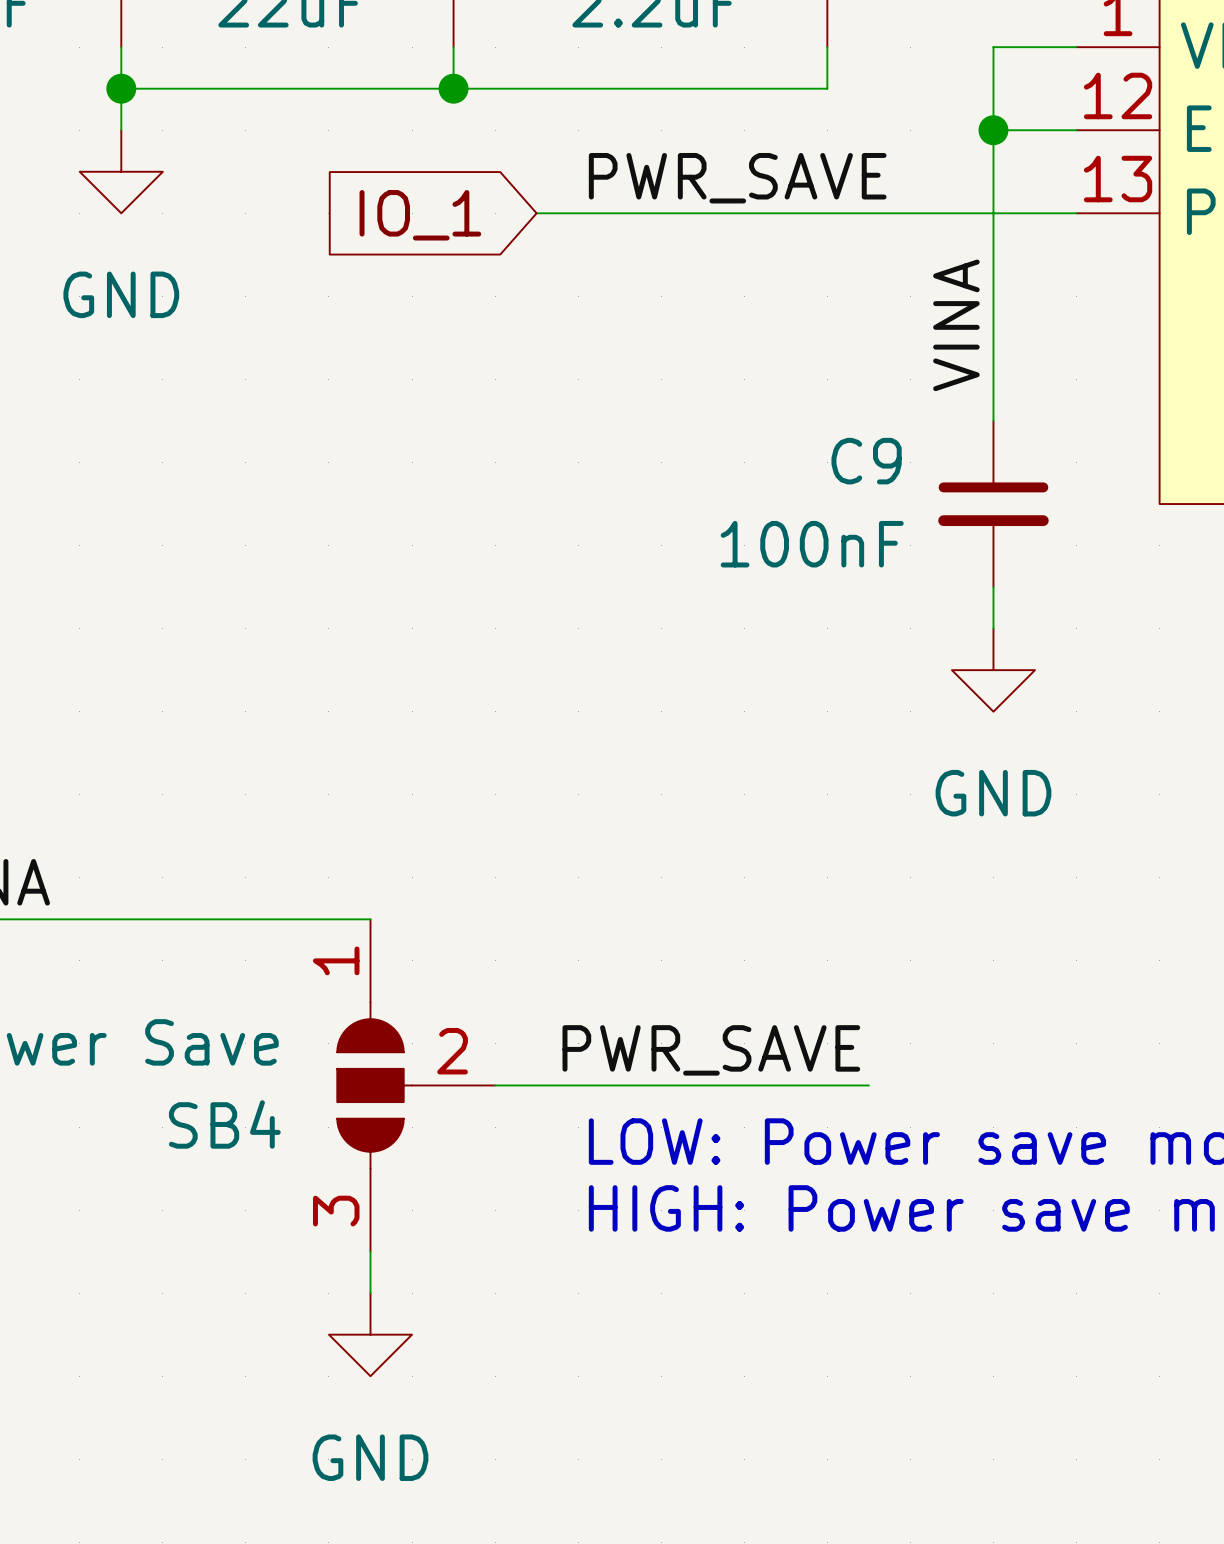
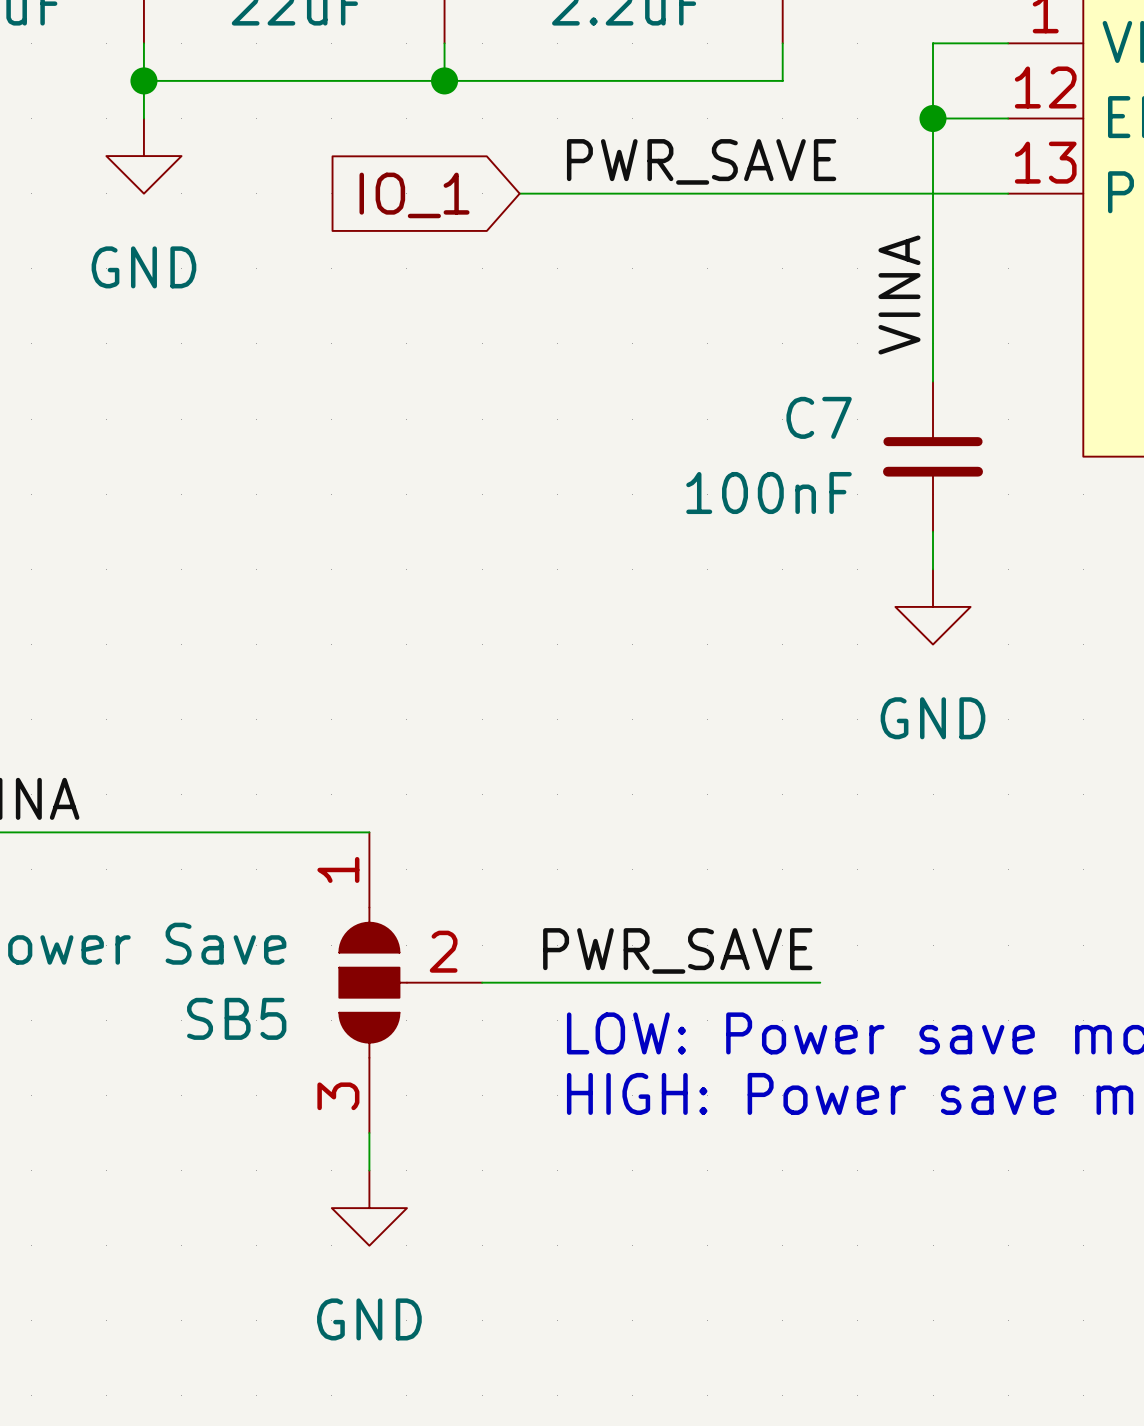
C9 name: C9 (866, 461) -> C7 (819, 417)
SB4 name: SB4 (224, 1124) -> SB5 (236, 1018)

